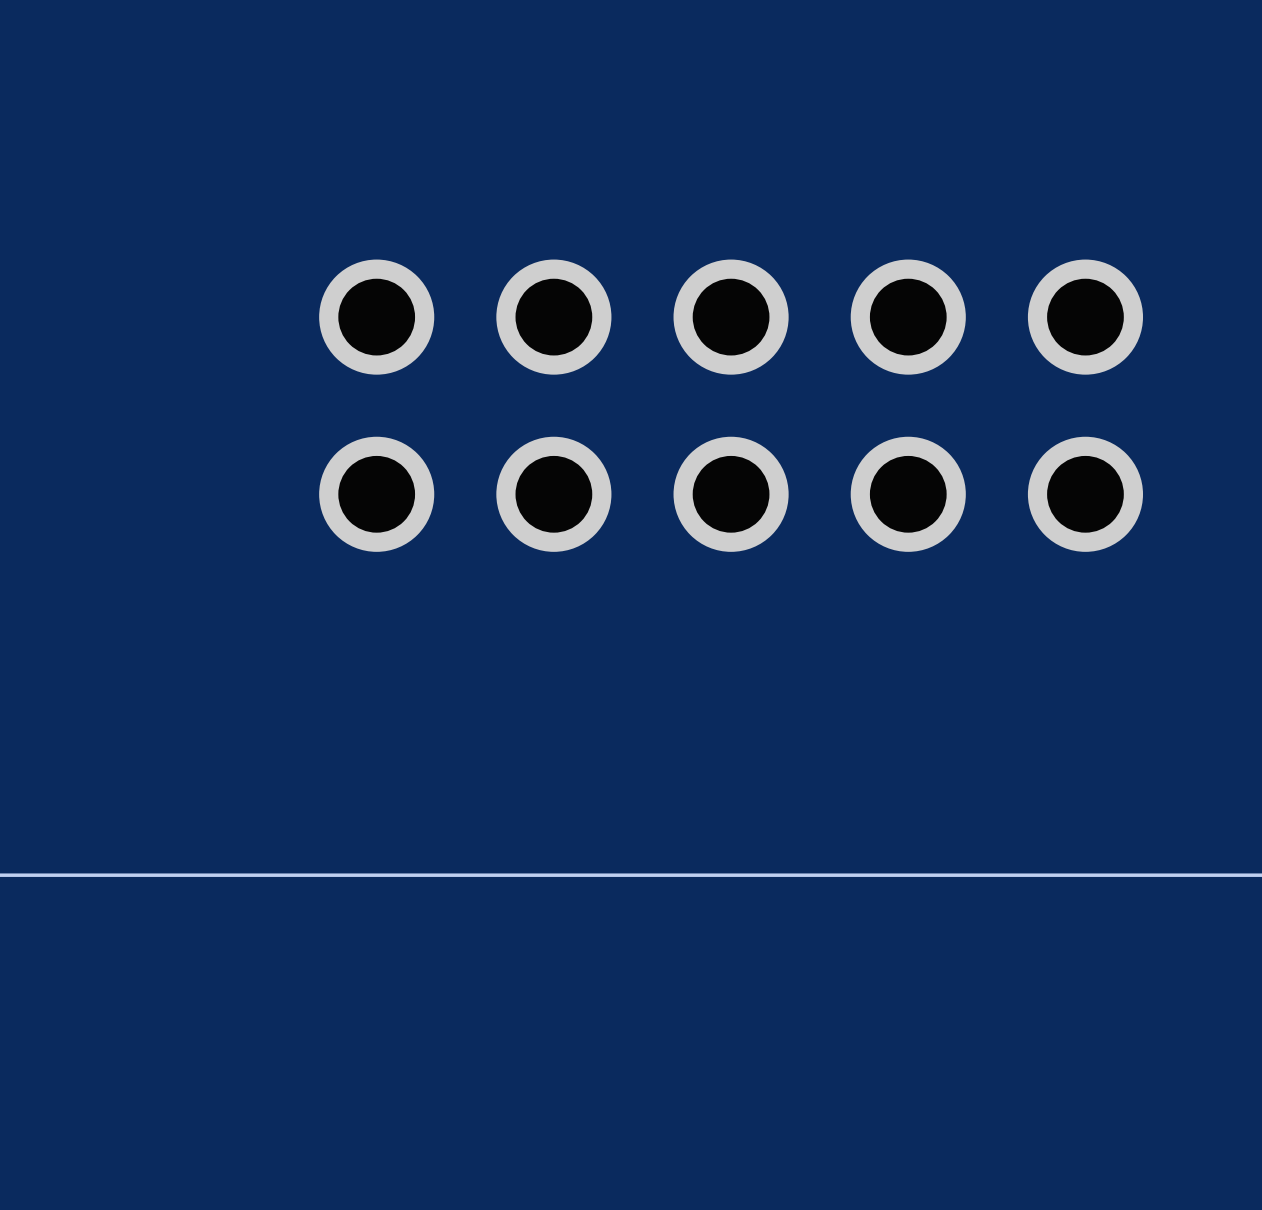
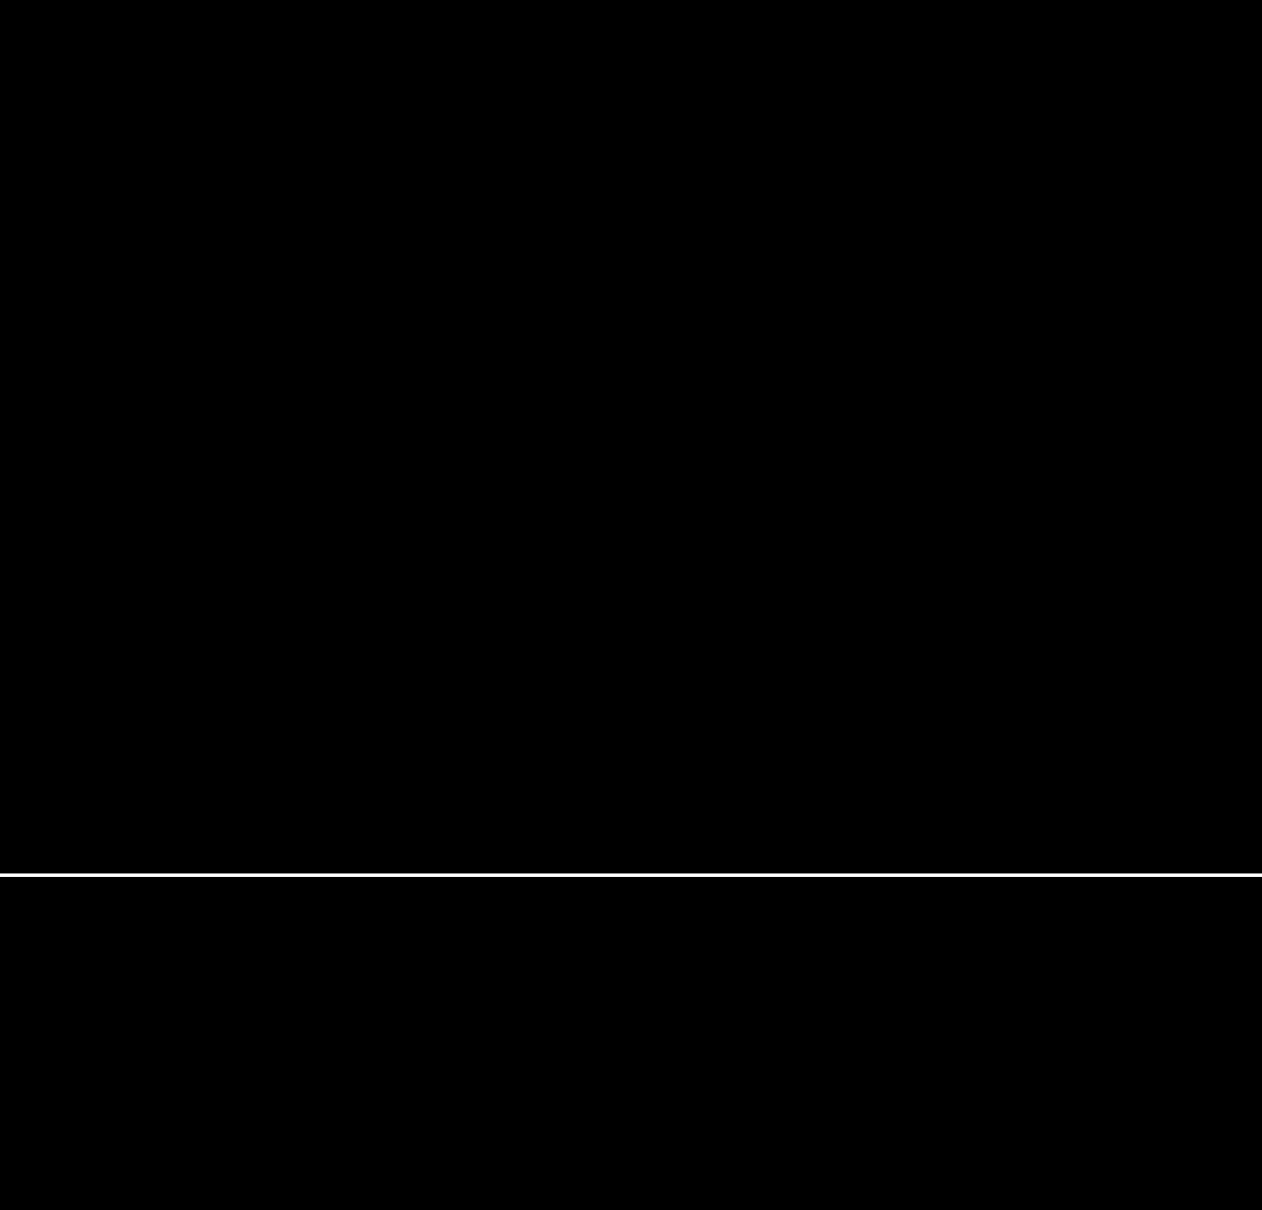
part: (731, 405) -> none

